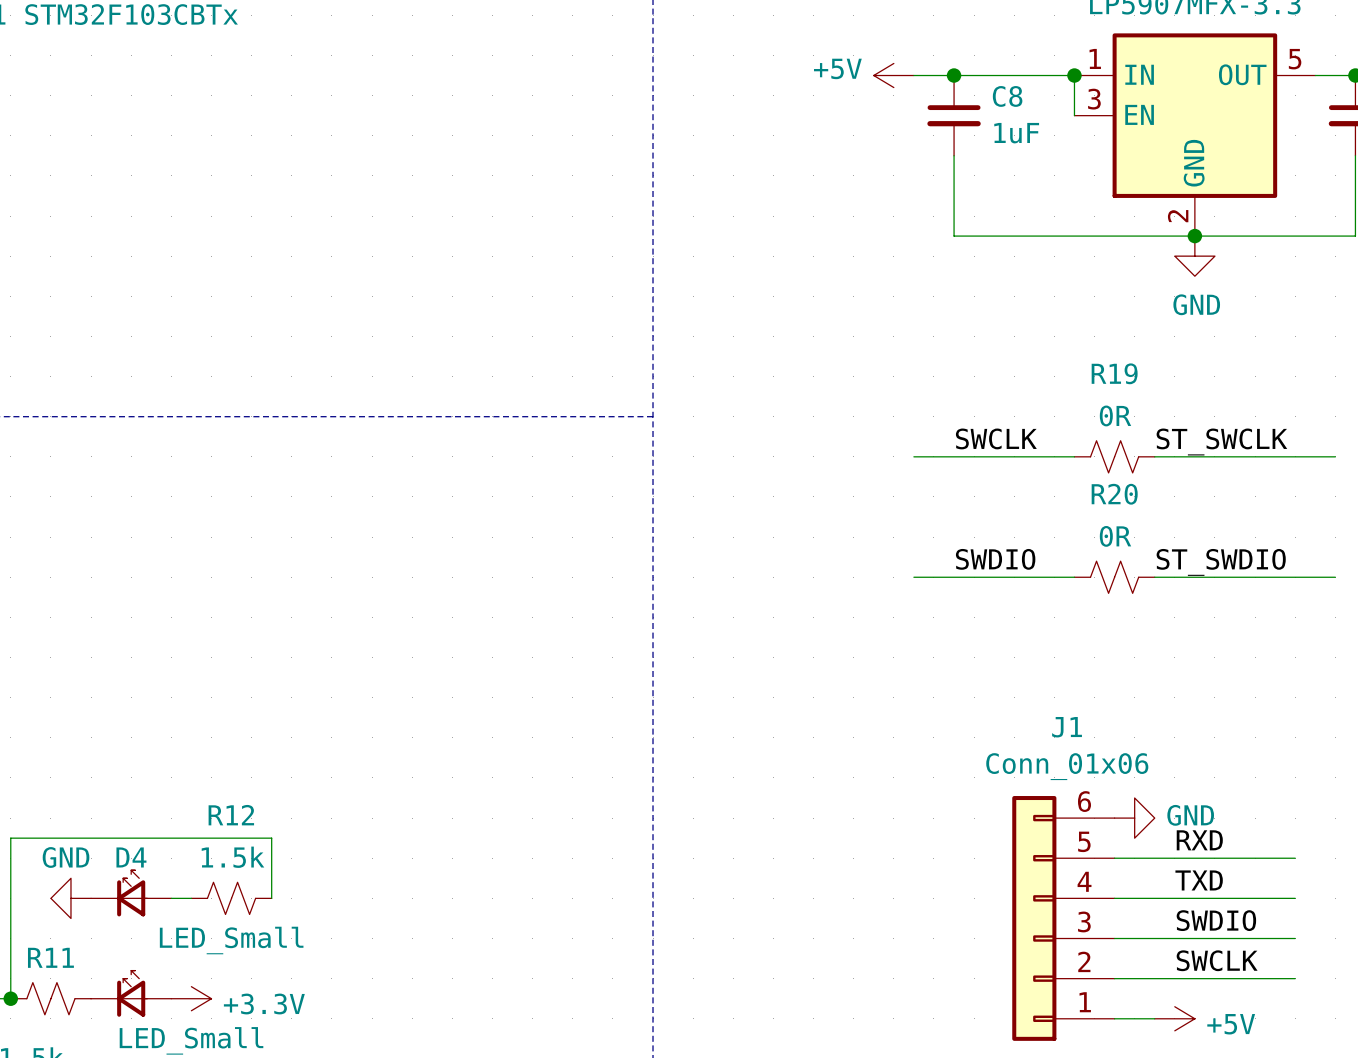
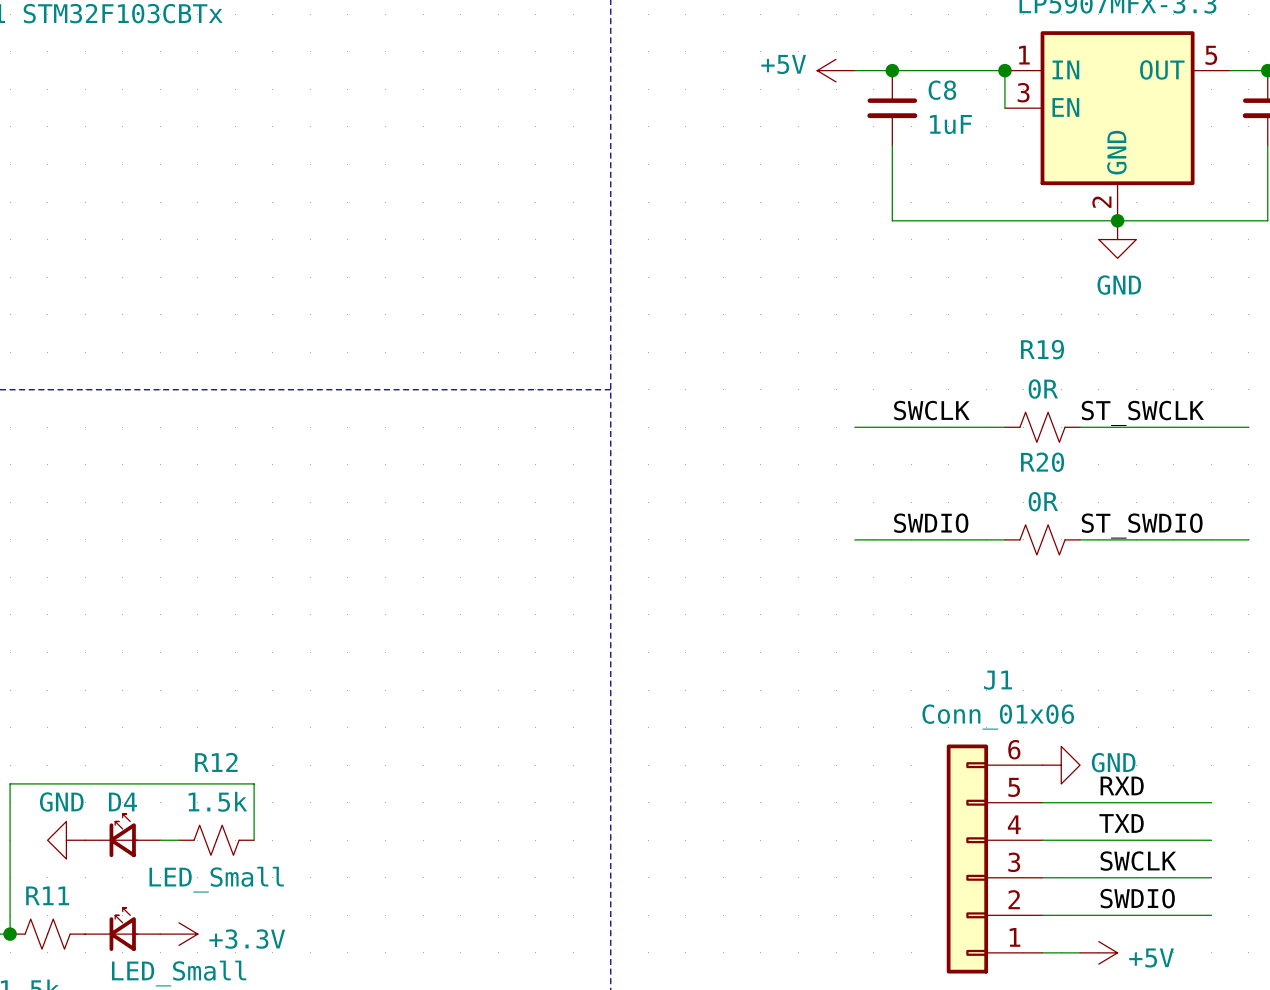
label: SWDIO (1216, 920) -> SWCLK (1138, 861)
label: SWCLK (1217, 960) -> SWDIO (1137, 898)

